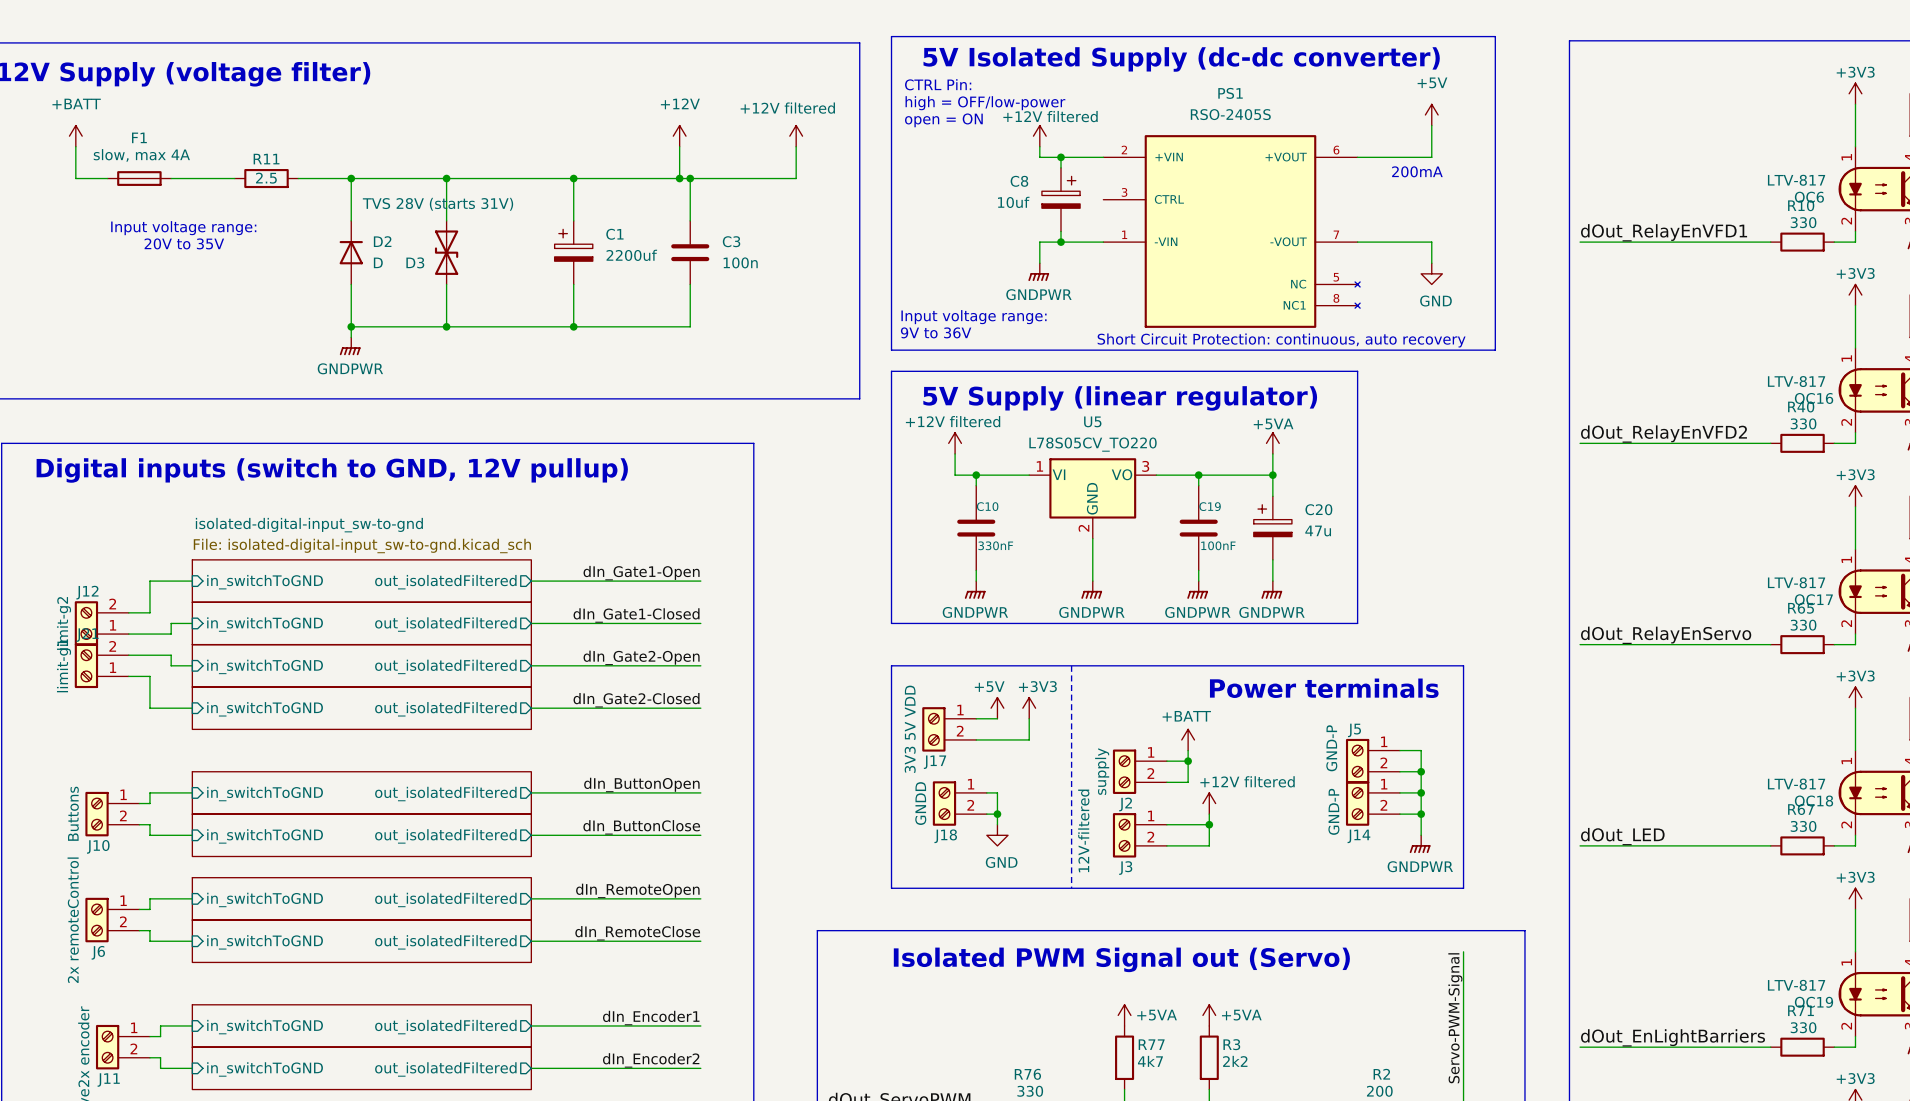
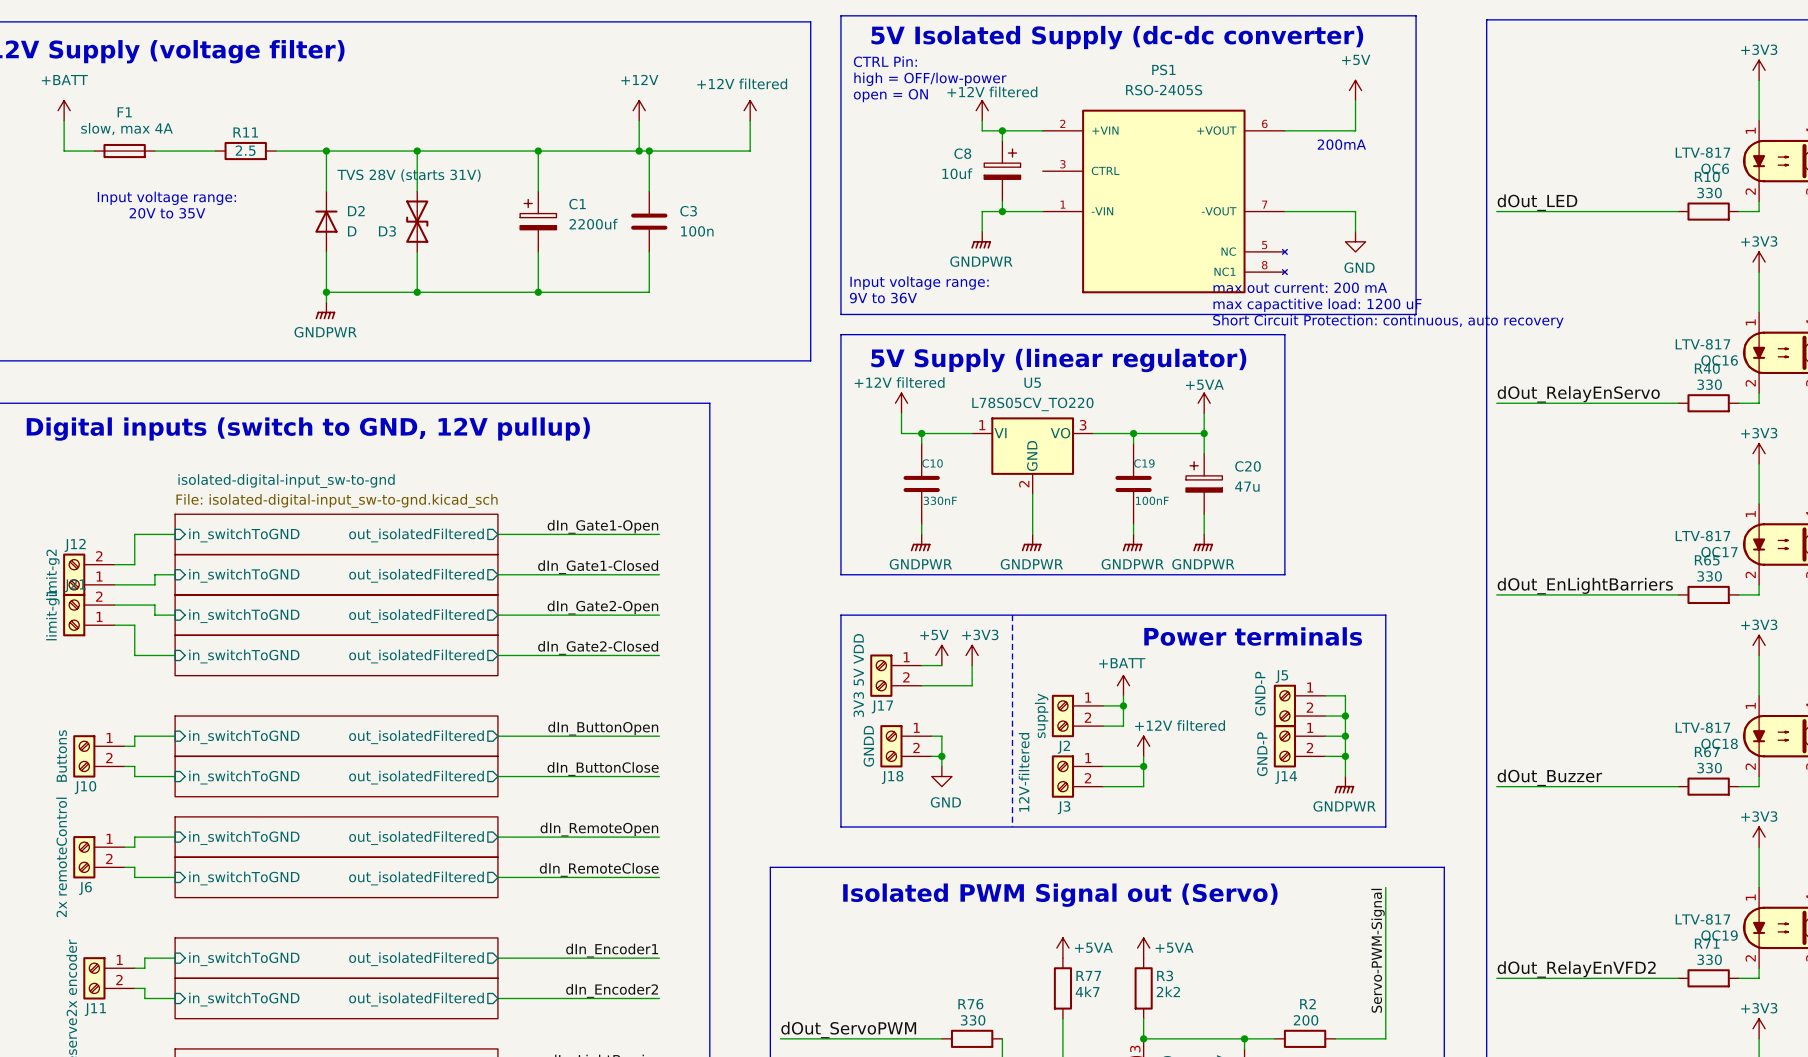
label: dOut_RelayEnVFD1 (1664, 232) -> dOut_LED (1537, 202)
text: none -> max out current: 200 mA (1300, 287)
text: Short Circuit Protection: continuous, auto recovery (1281, 340) -> max capactitive load: 1200 uF (1317, 305)
text: none -> Short Circuit Protection: continuous, auto recovery (1388, 321)
label: dOut_RelayEnVFD2 (1663, 434) -> dOut_RelayEnServo (1578, 394)
label: dOut_RelayEnServo (1666, 635) -> dOut_EnLightBarriers (1585, 586)
label: dOut_LED (1622, 836) -> dOut_Buzzer (1549, 777)
label: dOut_EnLightBarriers (1673, 1037) -> dOut_RelayEnVFD2 (1576, 969)

